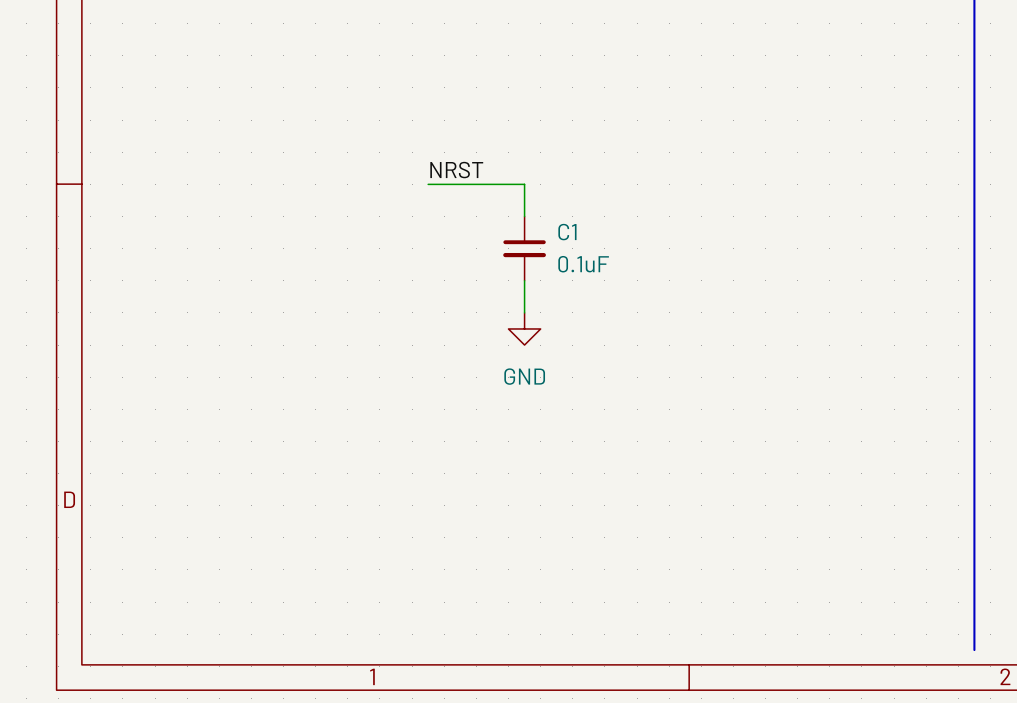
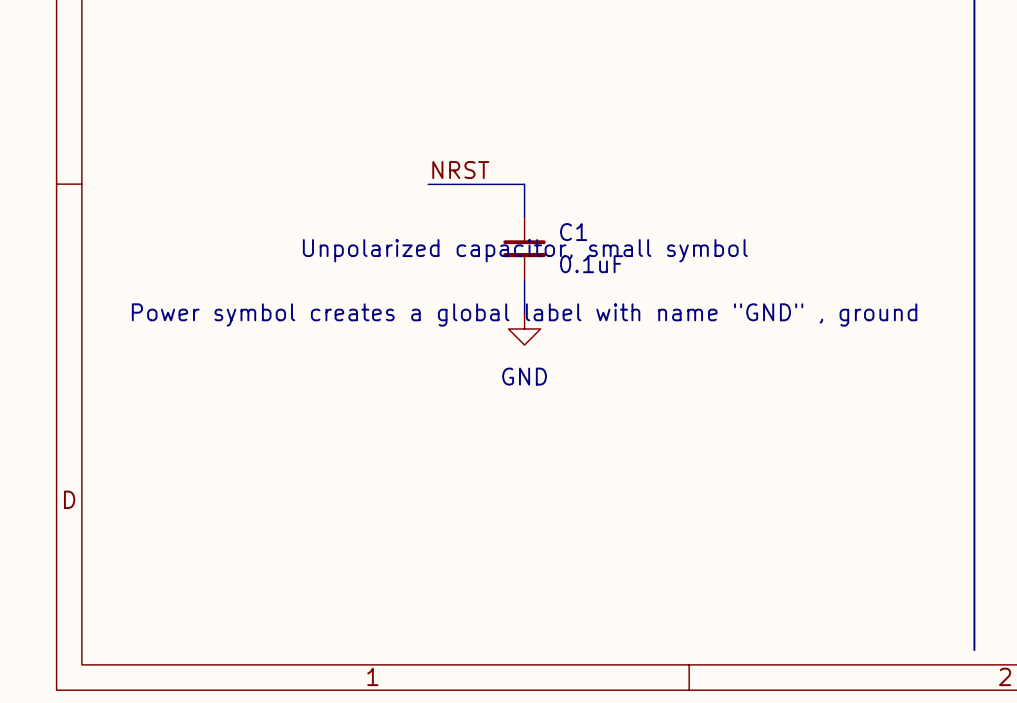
C1 text: none -> Unpolarized capacitor, small symbol (525, 250)
power symbol text: none -> Power symbol creates a global label with name "GND" , ground (524, 314)

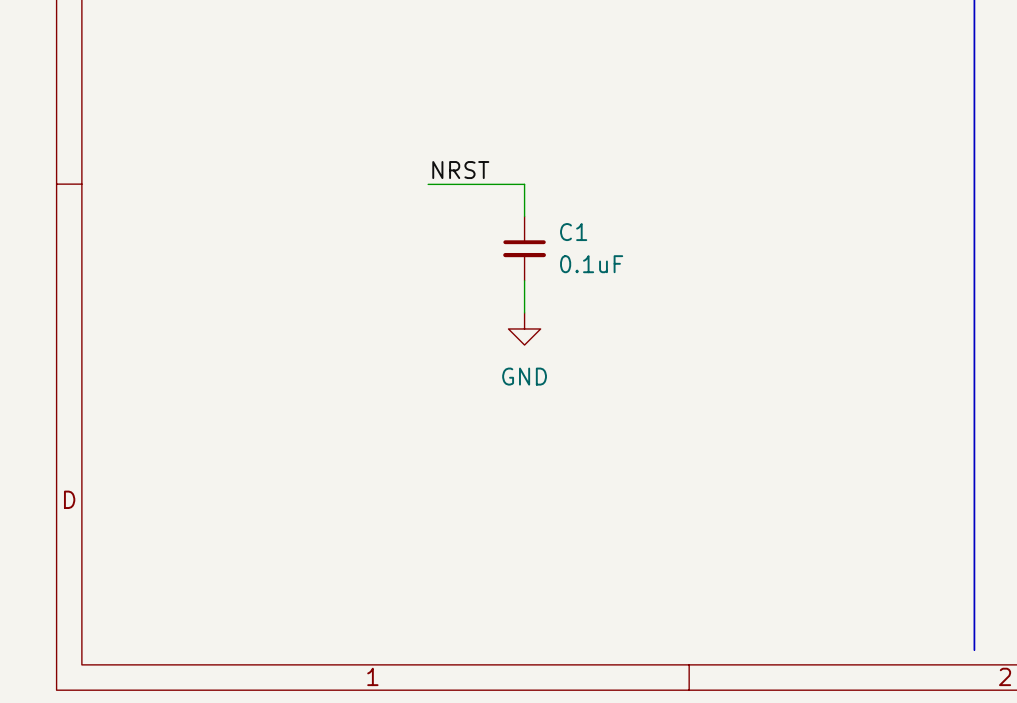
C1 text: Unpolarized capacitor, small symbol (525, 250) -> none
power symbol text: Power symbol creates a global label with name "GND" , ground (524, 314) -> none

